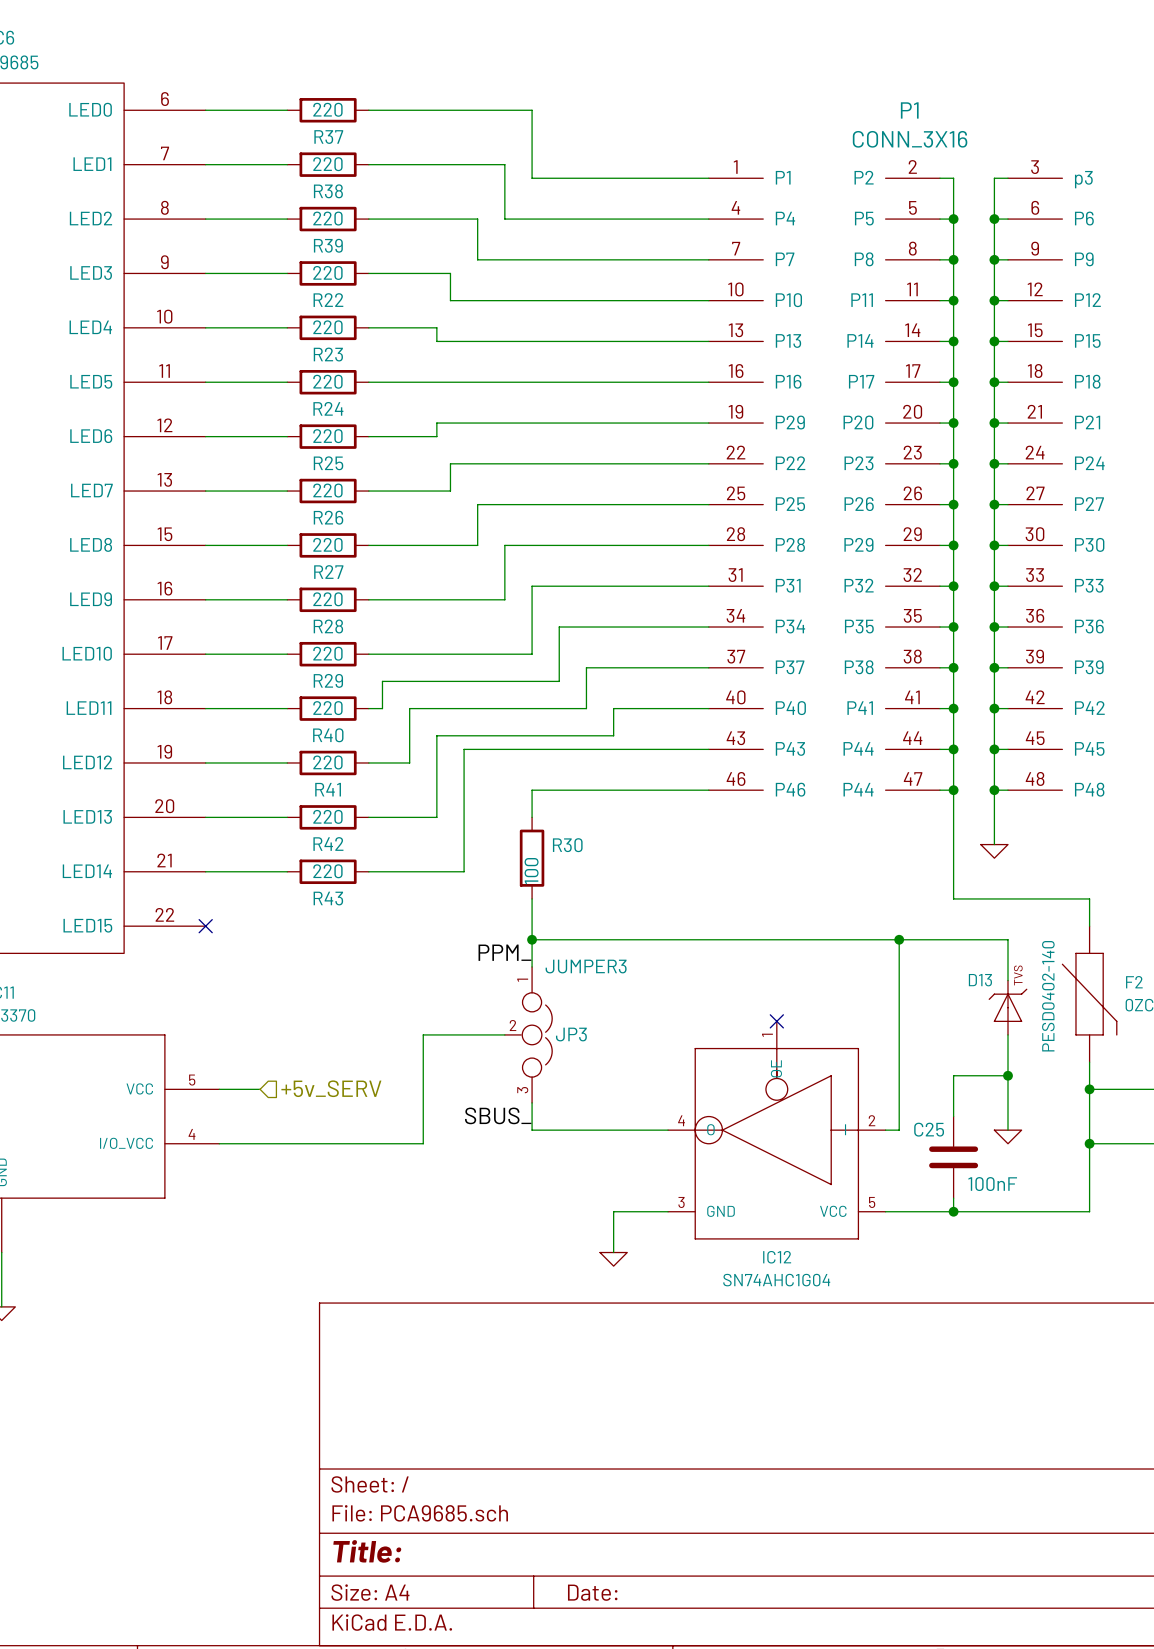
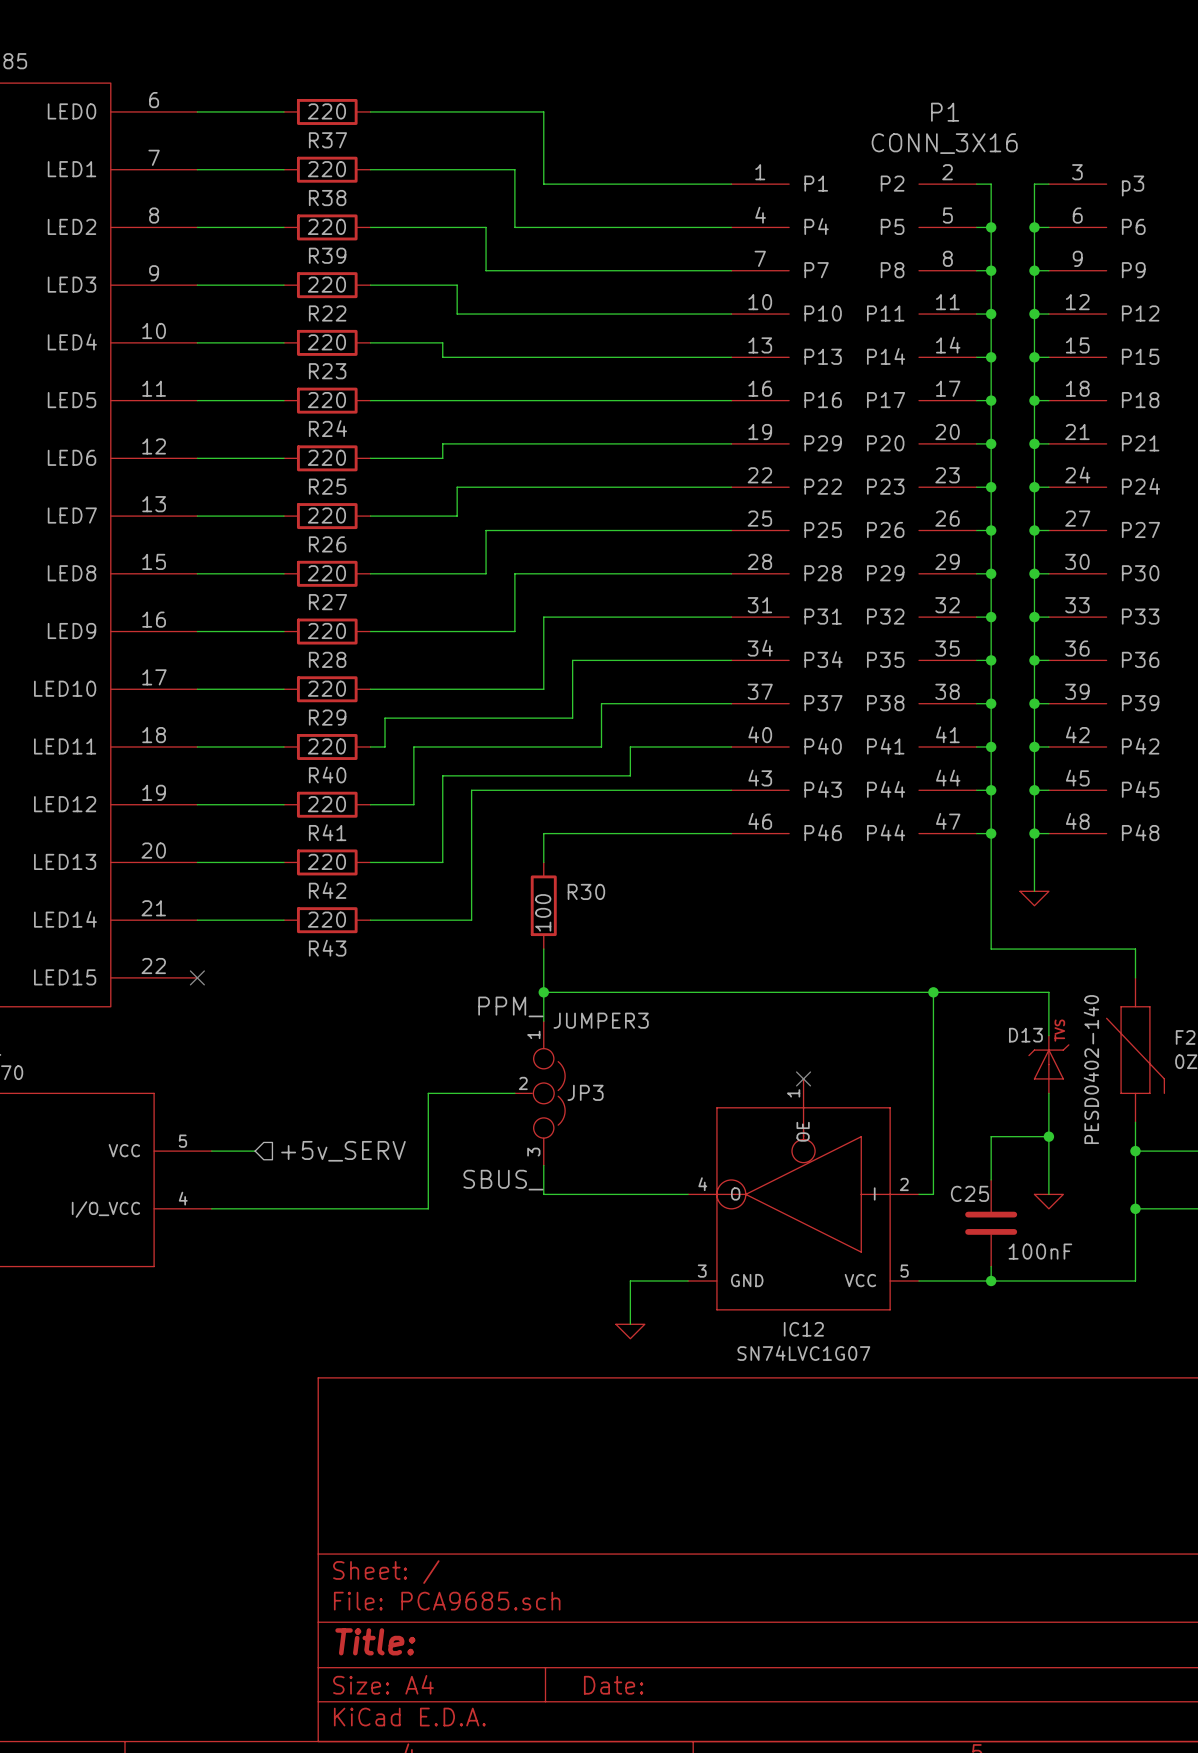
IC12 value: SN74AHC1G04 (776, 1280) -> SN74LVC1G07 (803, 1353)

